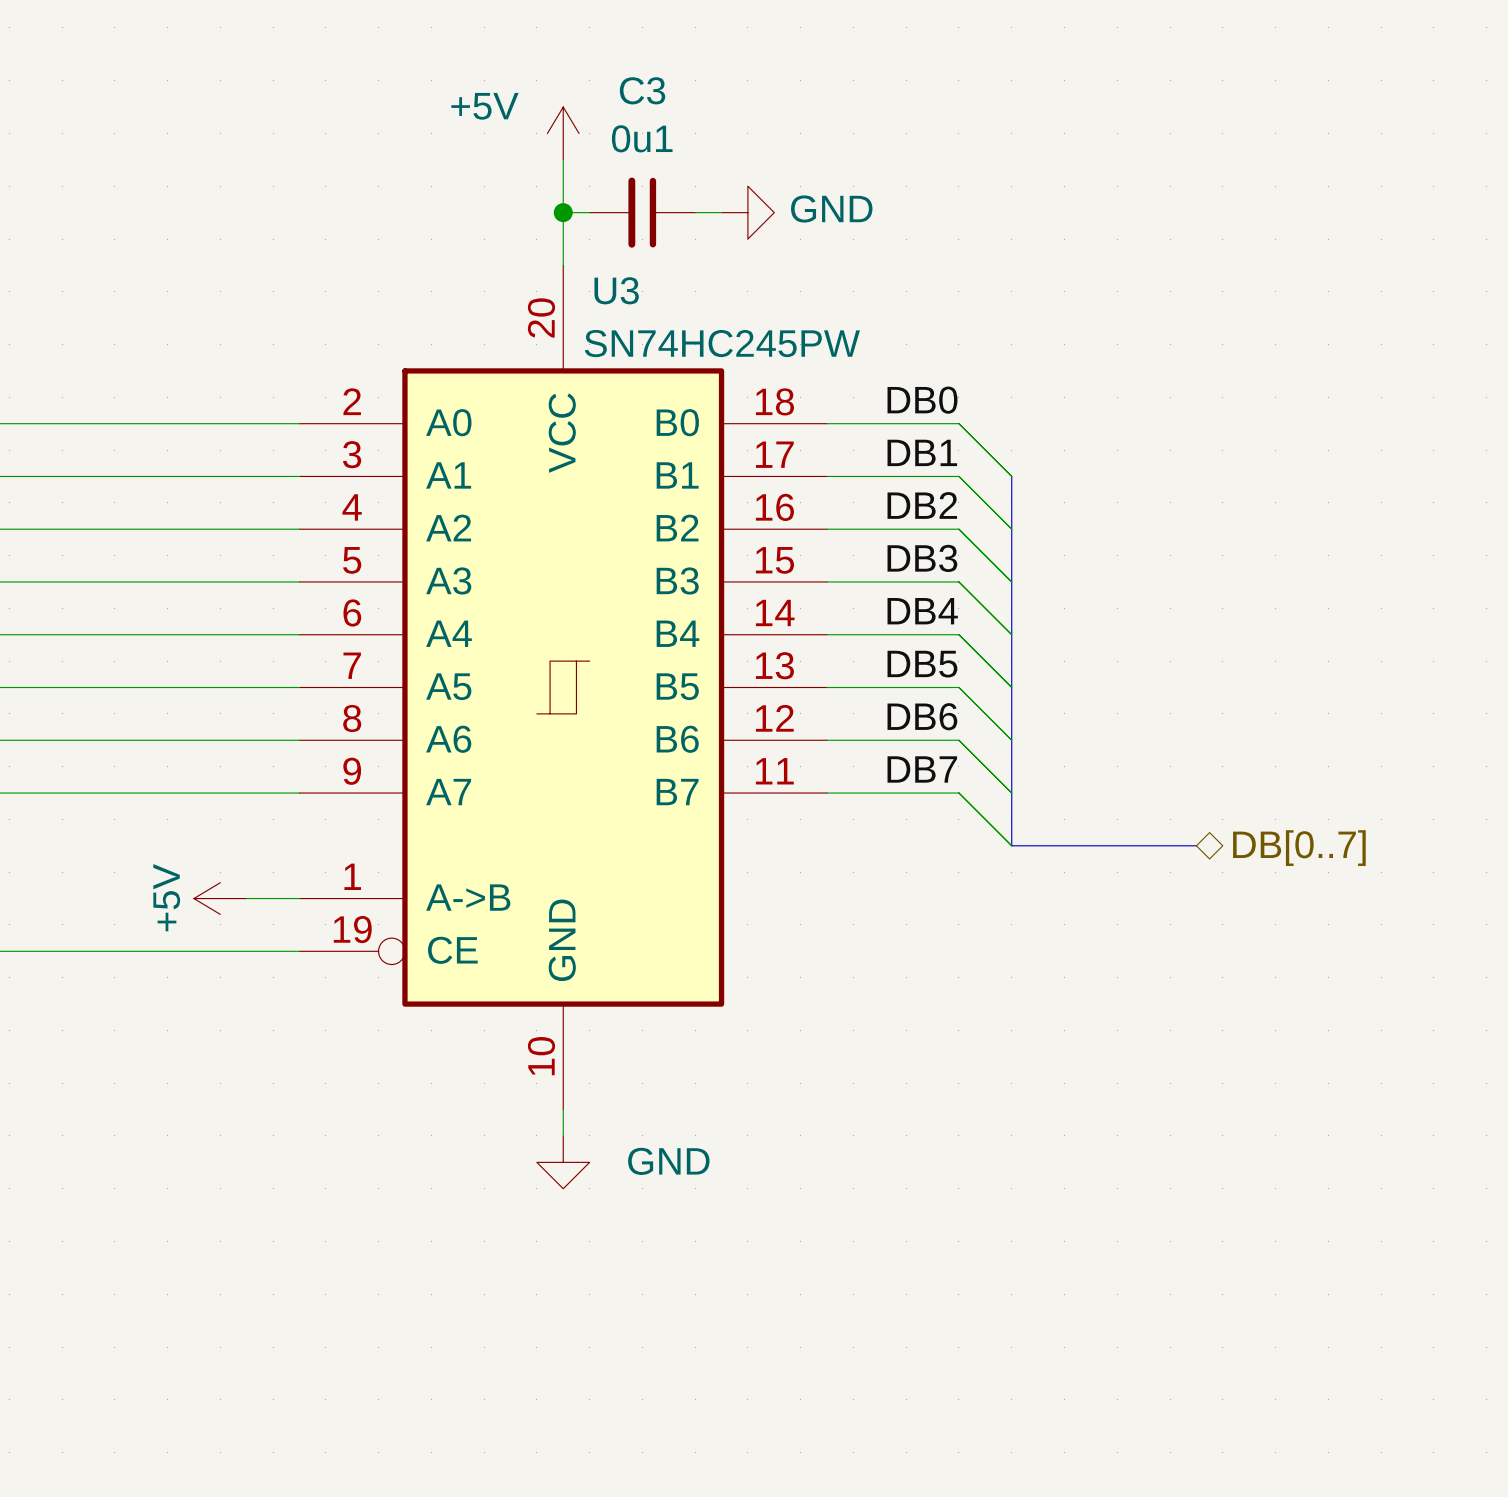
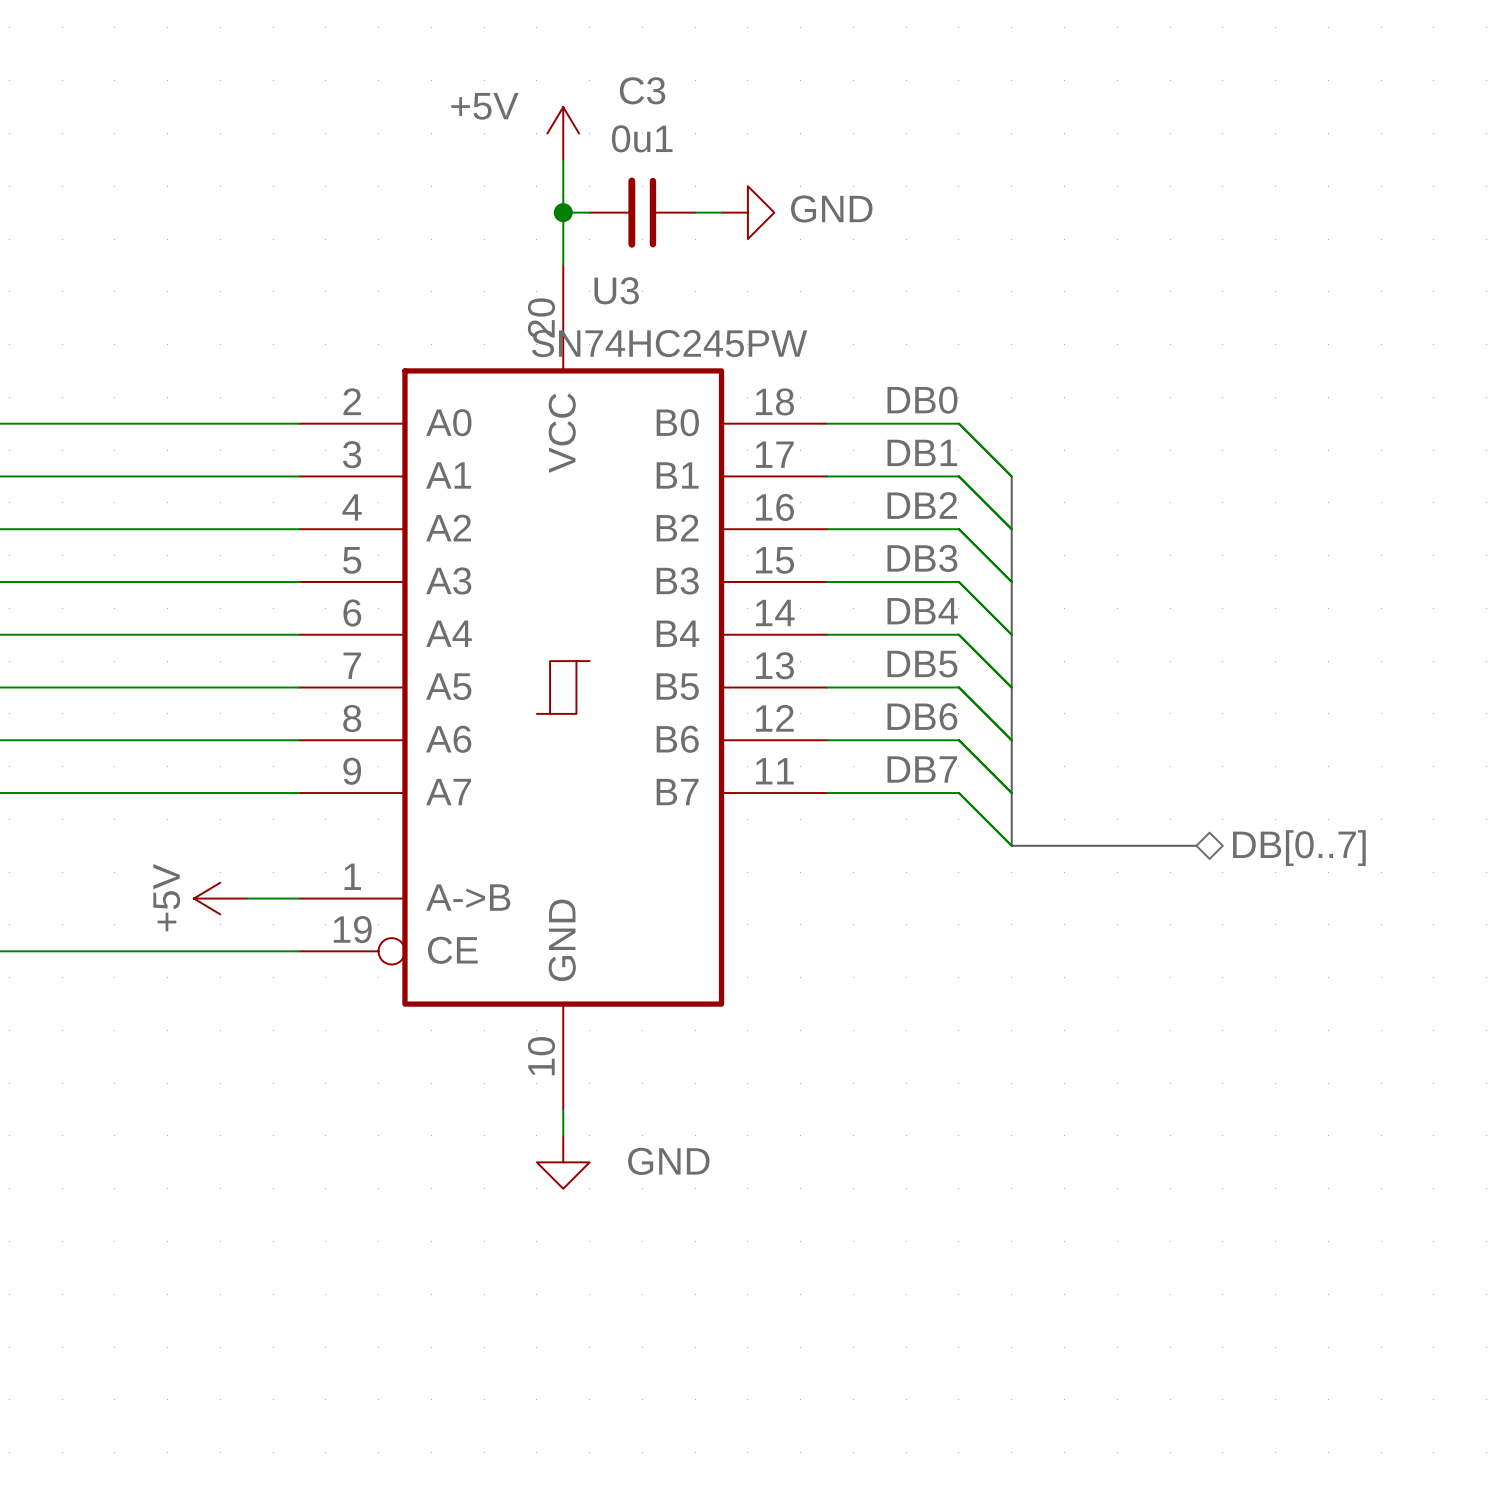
U3 value position: SN74HC245PW (722, 343) -> SN74HC245PW (669, 343)

